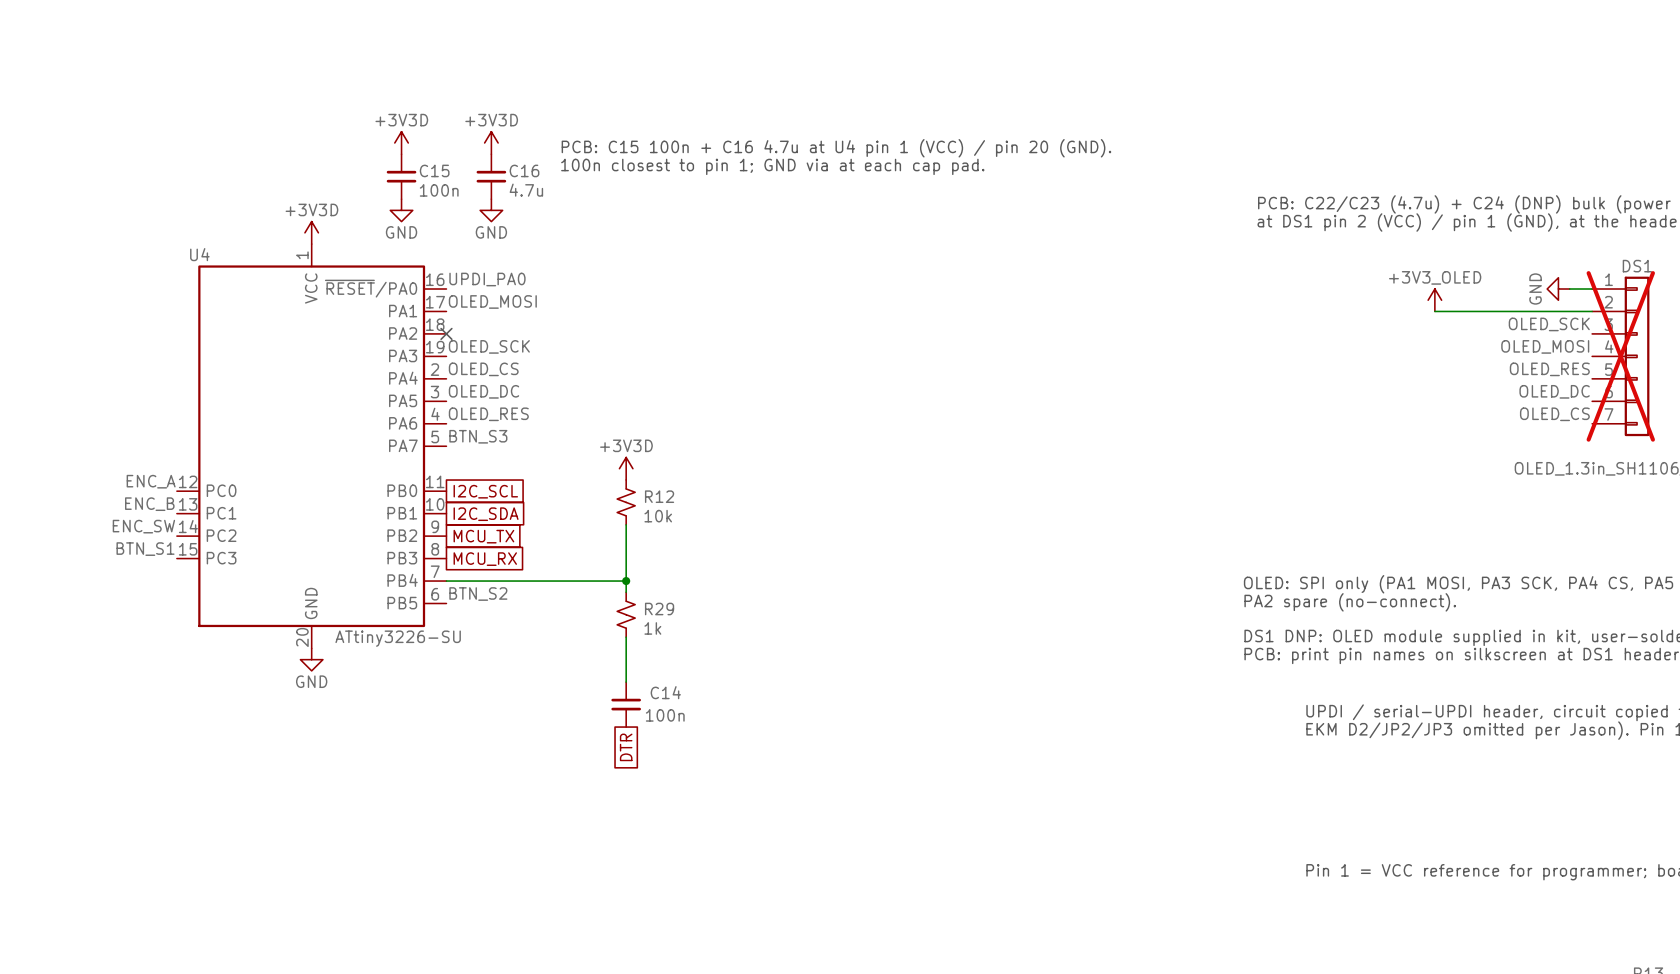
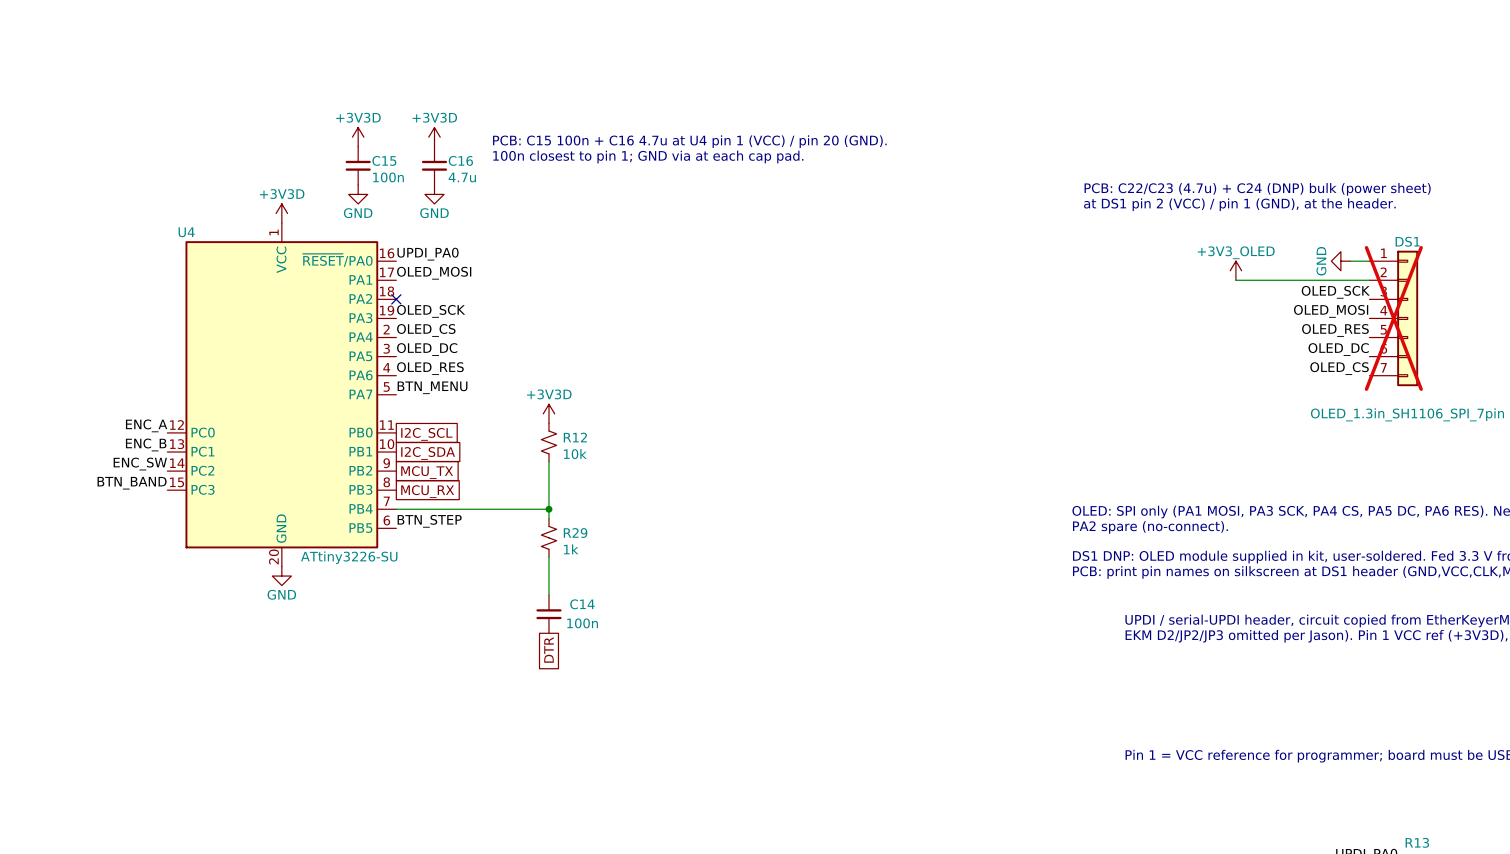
label: BTN_S3 (478, 436) -> BTN_MENU (432, 387)
label: BTN_S1 (145, 549) -> BTN_BAND (132, 483)
label: BTN_S2 (478, 594) -> BTN_STEP (429, 521)

